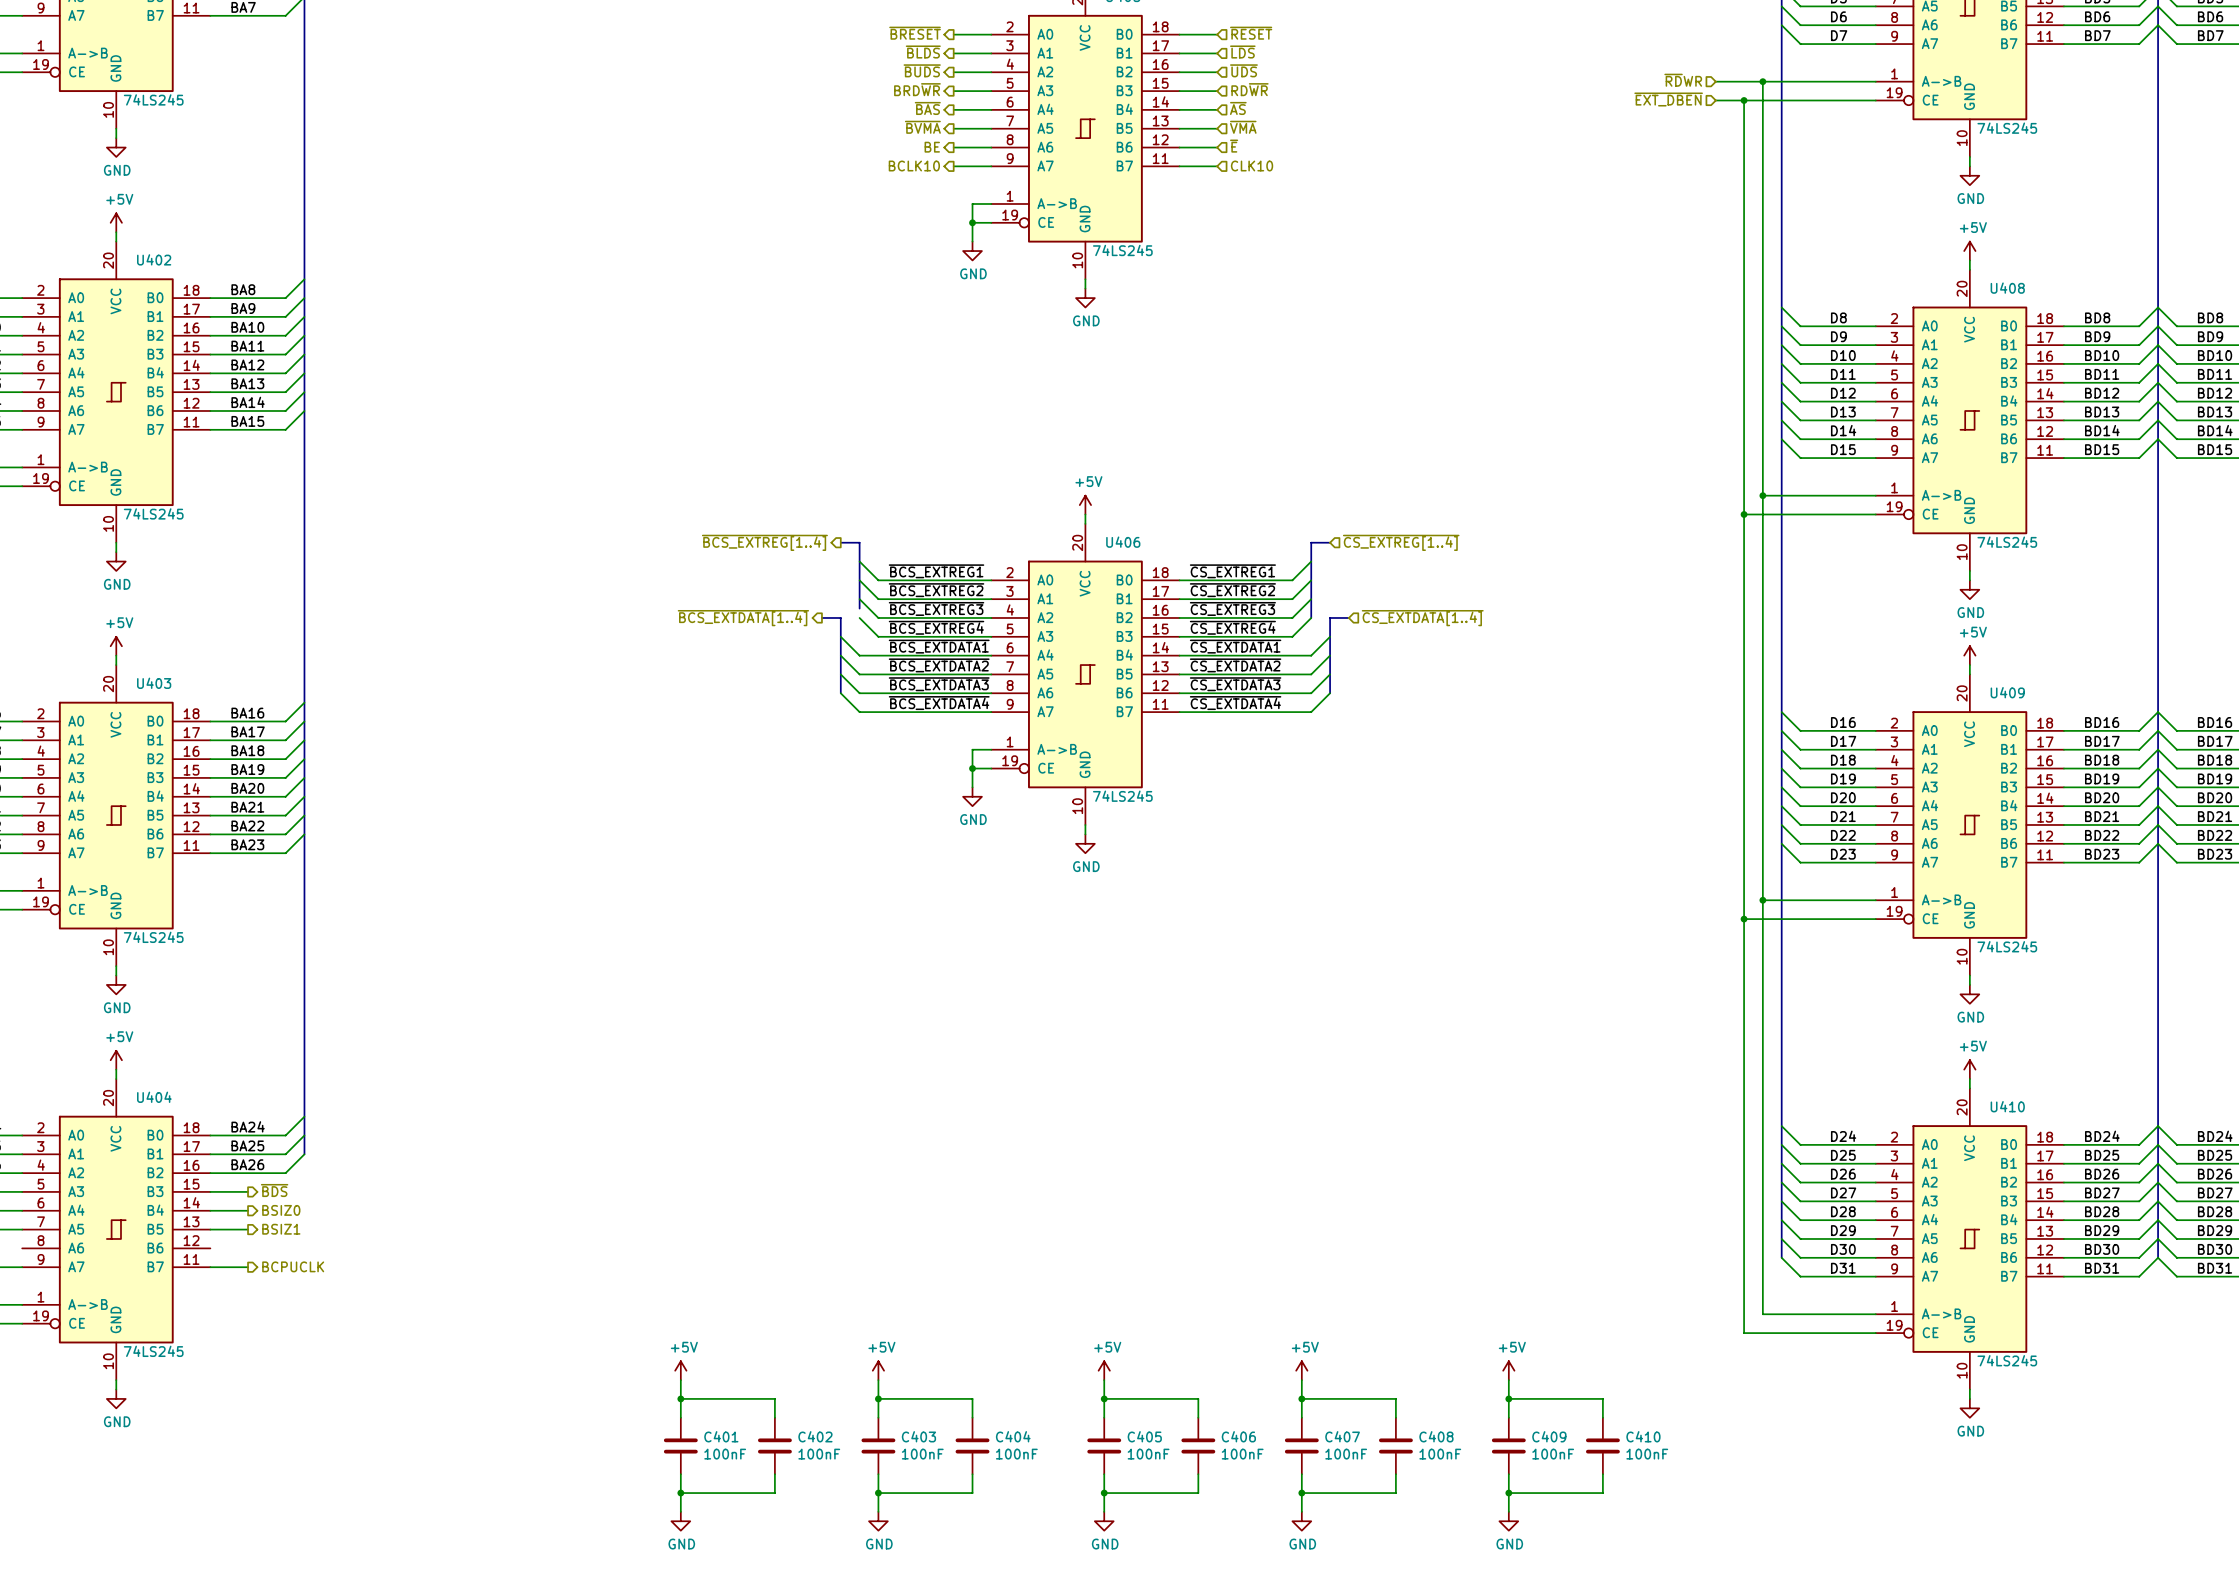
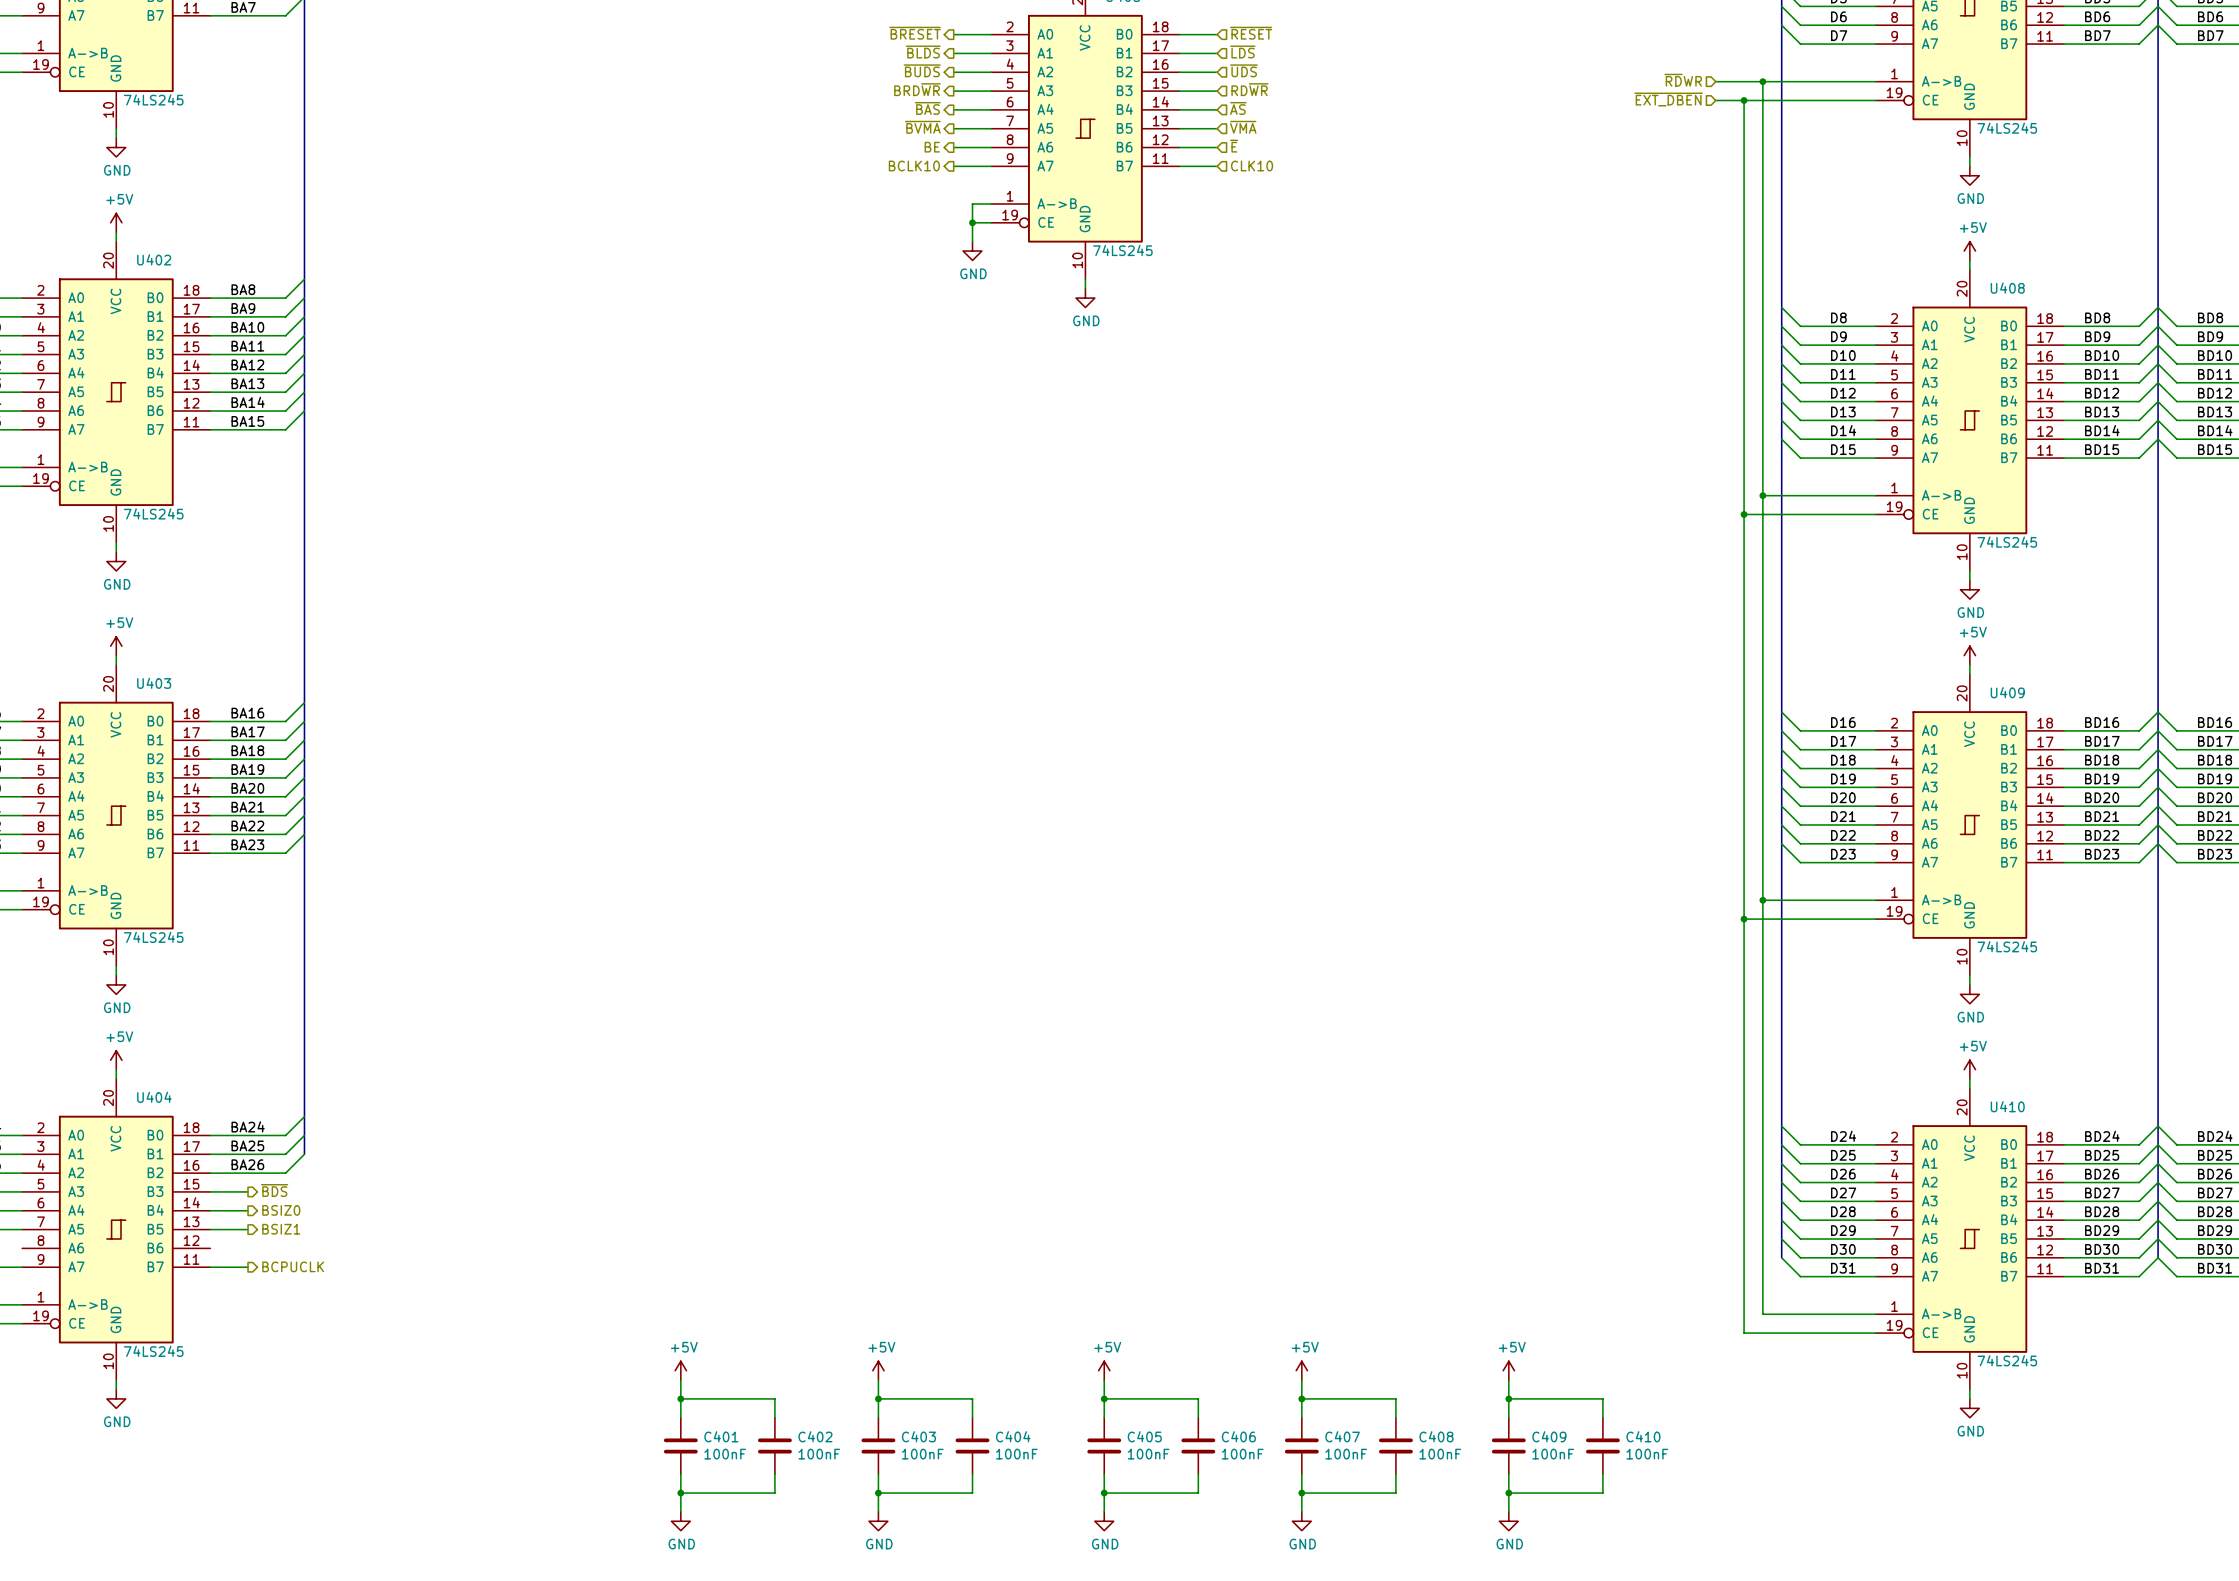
power symbol: +5V (1085, 505) -> none
wire: (1085, 514) (1085, 523) -> none
hierarchical label: ~{BCS_EXTREG[1..4]} (764, 542) -> none
bus: (840, 542) (859, 542) (859, 608) -> none
bus: (1330, 542) (1311, 542) (1311, 617) -> none
hierarchical label: ~{CS_EXTREG[1..4]} (1401, 542) -> none
wire: (859, 561) (878, 580) (991, 580) -> none
wire: (1311, 561) (1292, 580) (1179, 580) -> none
label: ~{BCS_EXTREG1} (936, 571) -> none
label: ~{CS_EXTREG1} (1232, 571) -> none
wire: (859, 580) (878, 599) (991, 599) -> none
wire: (1311, 580) (1292, 599) (1179, 599) -> none
label: ~{BCS_EXTREG2} (936, 590) -> none
label: ~{CS_EXTREG2} (1232, 590) -> none
wire: (859, 599) (878, 617) (991, 617) -> none
wire: (1311, 599) (1292, 617) (1179, 617) -> none
label: ~{BCS_EXTREG3} (936, 608) -> none
label: ~{CS_EXTREG3} (1232, 608) -> none
bus: (821, 617) (840, 617) (840, 693) -> none
wire: (859, 617) (878, 636) (991, 636) -> none
wire: (1311, 617) (1292, 636) (1179, 636) -> none
bus: (1348, 617) (1330, 617) (1330, 693) -> none
hierarchical label: ~{BCS_EXTDATA[1..4]} (743, 618) -> none
hierarchical label: ~{CS_EXTDATA[1..4]} (1422, 618) -> none
label: ~{BCS_EXTREG4} (936, 627) -> none
label: ~{CS_EXTREG4} (1232, 627) -> none
wire: (840, 636) (859, 655) (991, 655) -> none
wire: (1330, 636) (1311, 655) (1179, 655) -> none
label: ~{BCS_EXTDATA1} (939, 646) -> none
label: ~{CS_EXTDATA1} (1235, 646) -> none
wire: (840, 655) (859, 674) (991, 674) -> none
wire: (1330, 655) (1311, 674) (1179, 674) -> none
label: ~{BCS_EXTDATA2} (939, 665) -> none
label: ~{CS_EXTDATA2} (1235, 665) -> none
wire: (840, 674) (859, 693) (991, 693) -> none
U406: 74LS245 (1085, 674) -> none
wire: (1330, 674) (1311, 693) (1179, 693) -> none
label: ~{BCS_EXTDATA3} (939, 684) -> none
label: ~{CS_EXTDATA3} (1235, 684) -> none
wire: (840, 693) (859, 712) (991, 712) -> none
wire: (1330, 693) (1311, 712) (1179, 712) -> none
label: ~{BCS_EXTDATA4} (939, 703) -> none
label: ~{CS_EXTDATA4} (1235, 703) -> none
wire: (991, 749) (972, 749) (972, 787) -> none
wire: (972, 768) (991, 768) -> none
junction: (972, 768) -> none
power symbol: GND (972, 796) -> none
wire: (1085, 824) (1085, 834) -> none
power symbol: GND (1085, 843) -> none

